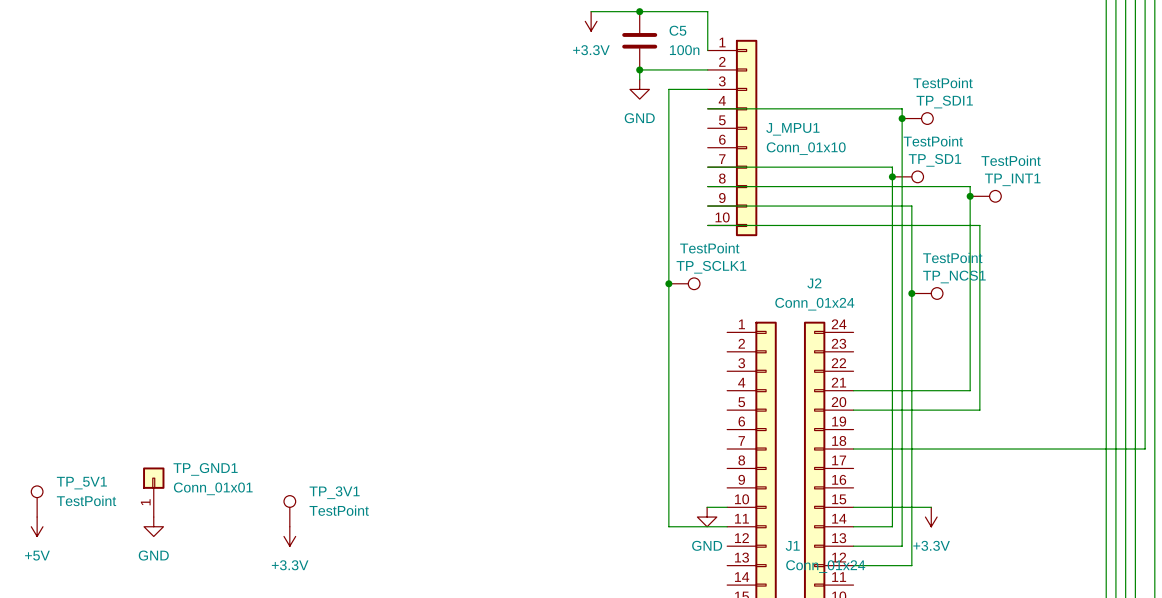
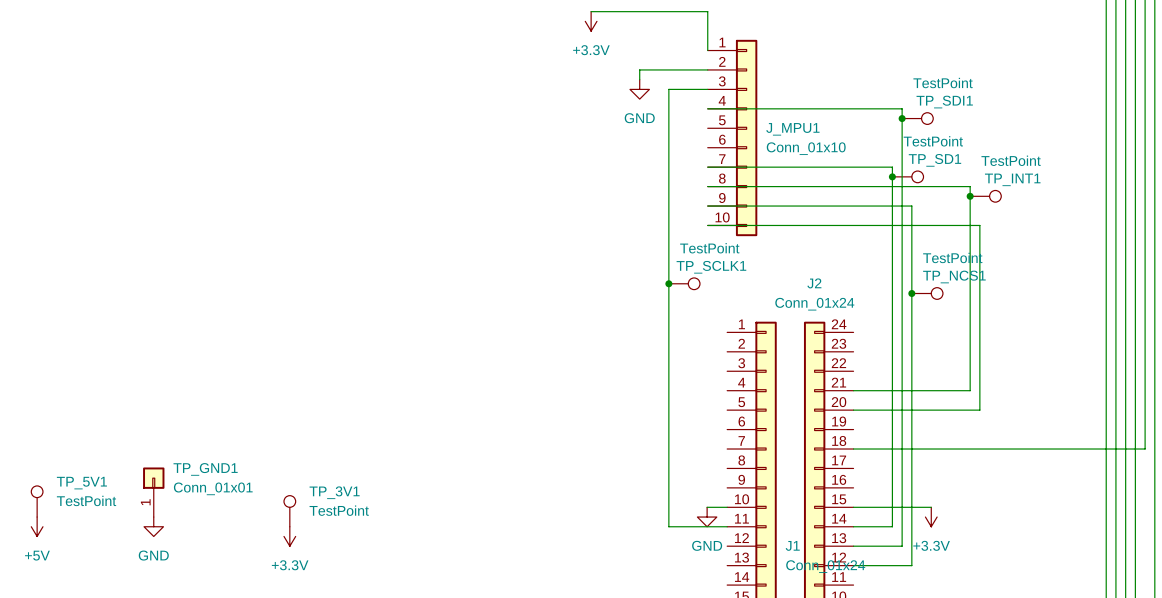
junction: (639, 11) -> none
C5: 100n (639, 40) -> none
junction: (639, 69) -> none

